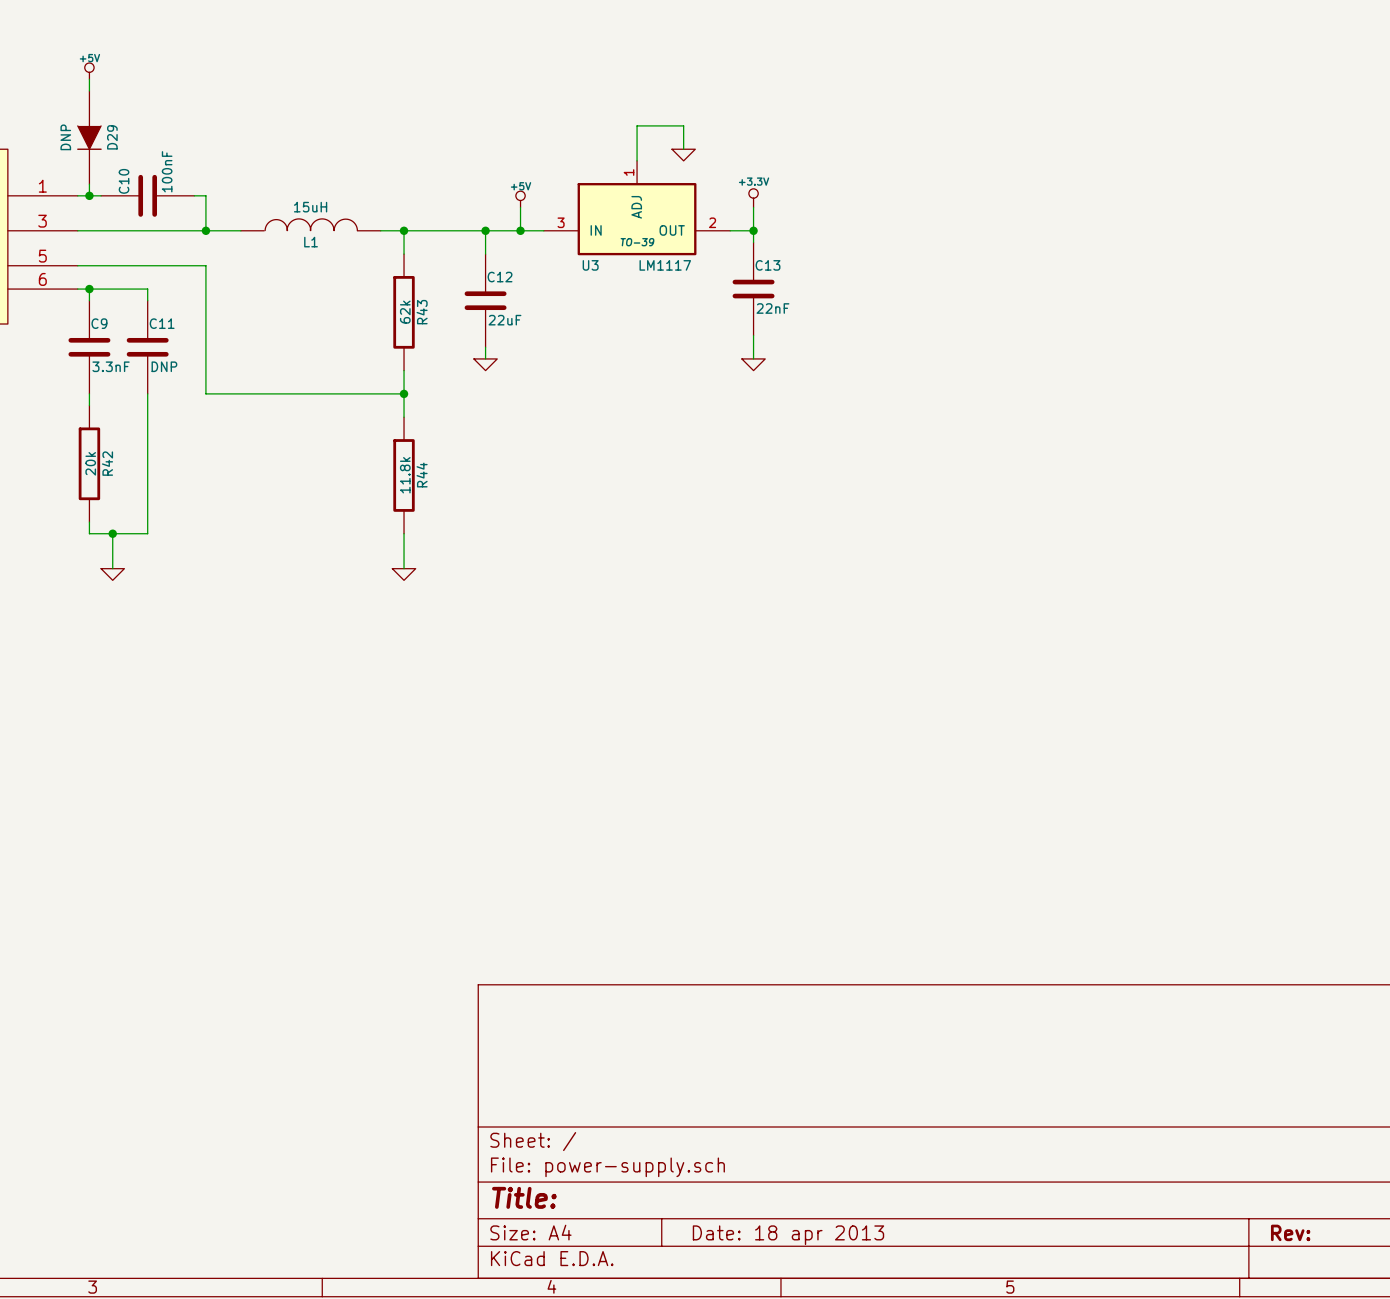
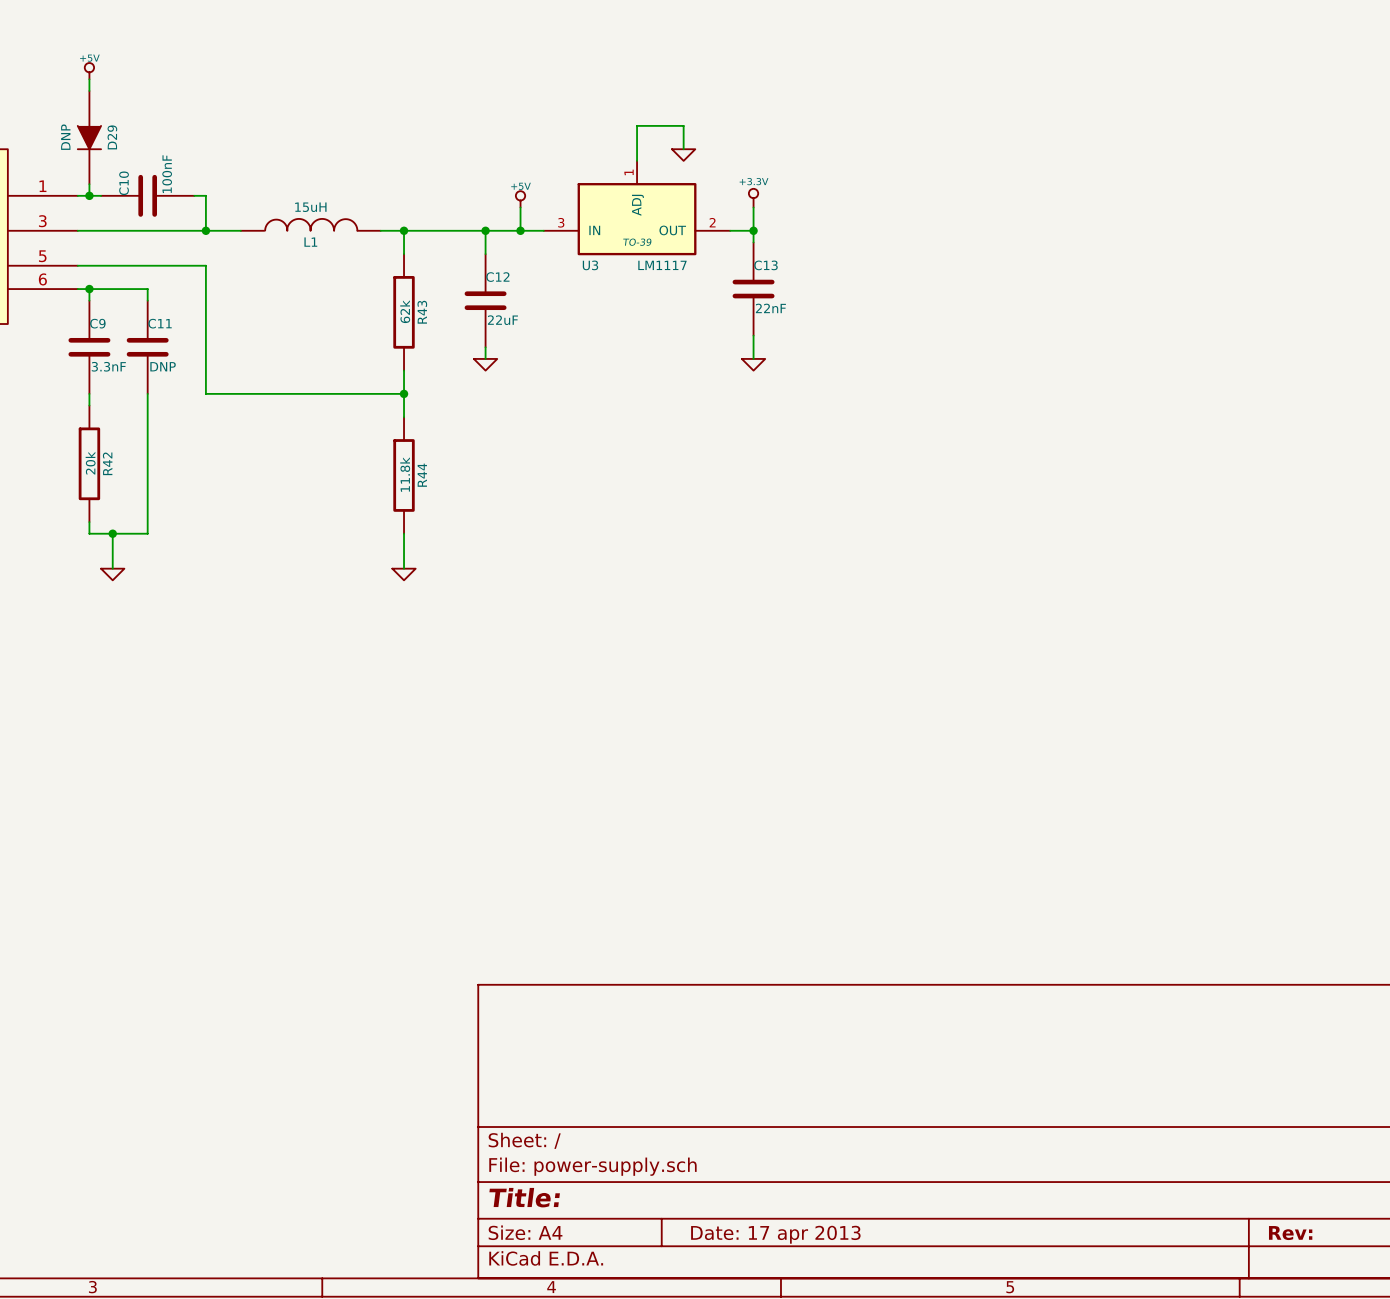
title block: Date: 18 apr 2013 (788, 1235) -> Date: 17 apr 2013 (775, 1234)

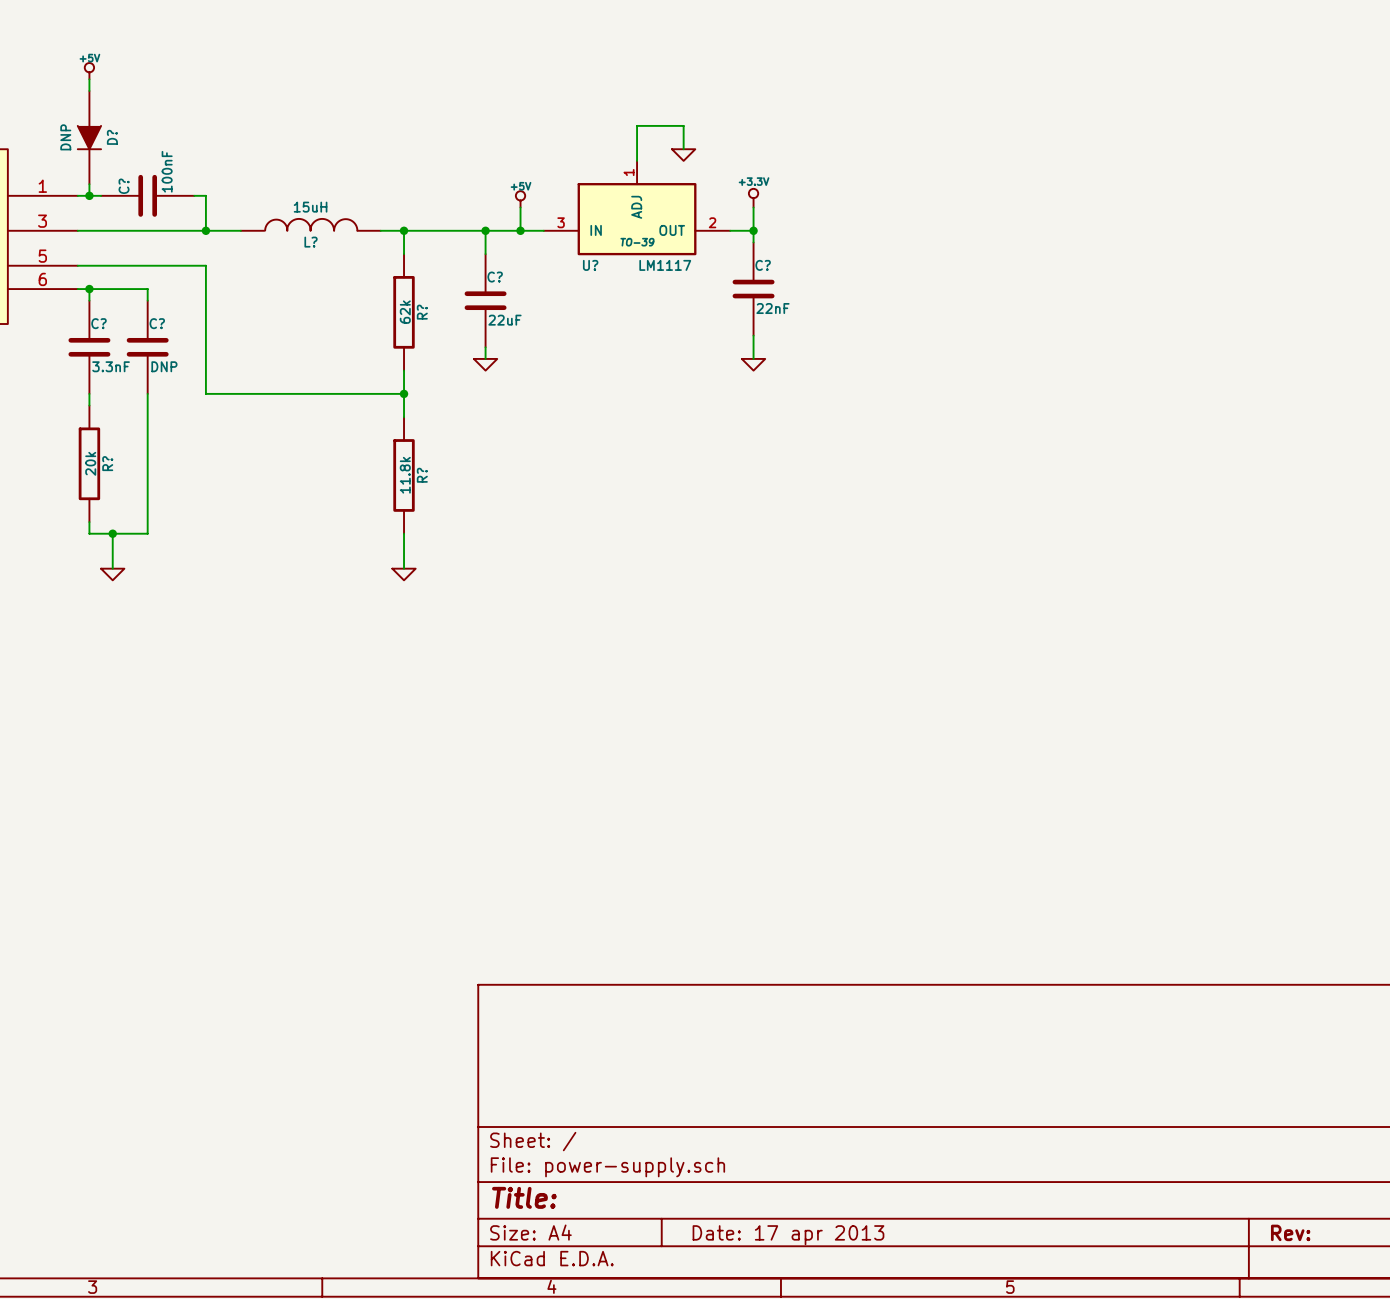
D29 name: D29 (112, 137) -> D? (112, 137)
C10 name: C10 (124, 183) -> C? (124, 186)
L1 name: L1 (310, 242) -> L? (311, 242)
U3 name: U3 (590, 265) -> U? (590, 265)
C13 name: C13 (765, 265) -> C? (763, 265)
C12 name: C12 (497, 277) -> C? (495, 277)
R43 name: R43 (422, 312) -> R? (422, 312)
C9 name: C9 (97, 323) -> C? (99, 323)
C11 name: C11 (160, 323) -> C? (157, 323)
R42 name: R42 (107, 463) -> R? (107, 463)
R44 name: R44 (422, 475) -> R? (422, 475)

